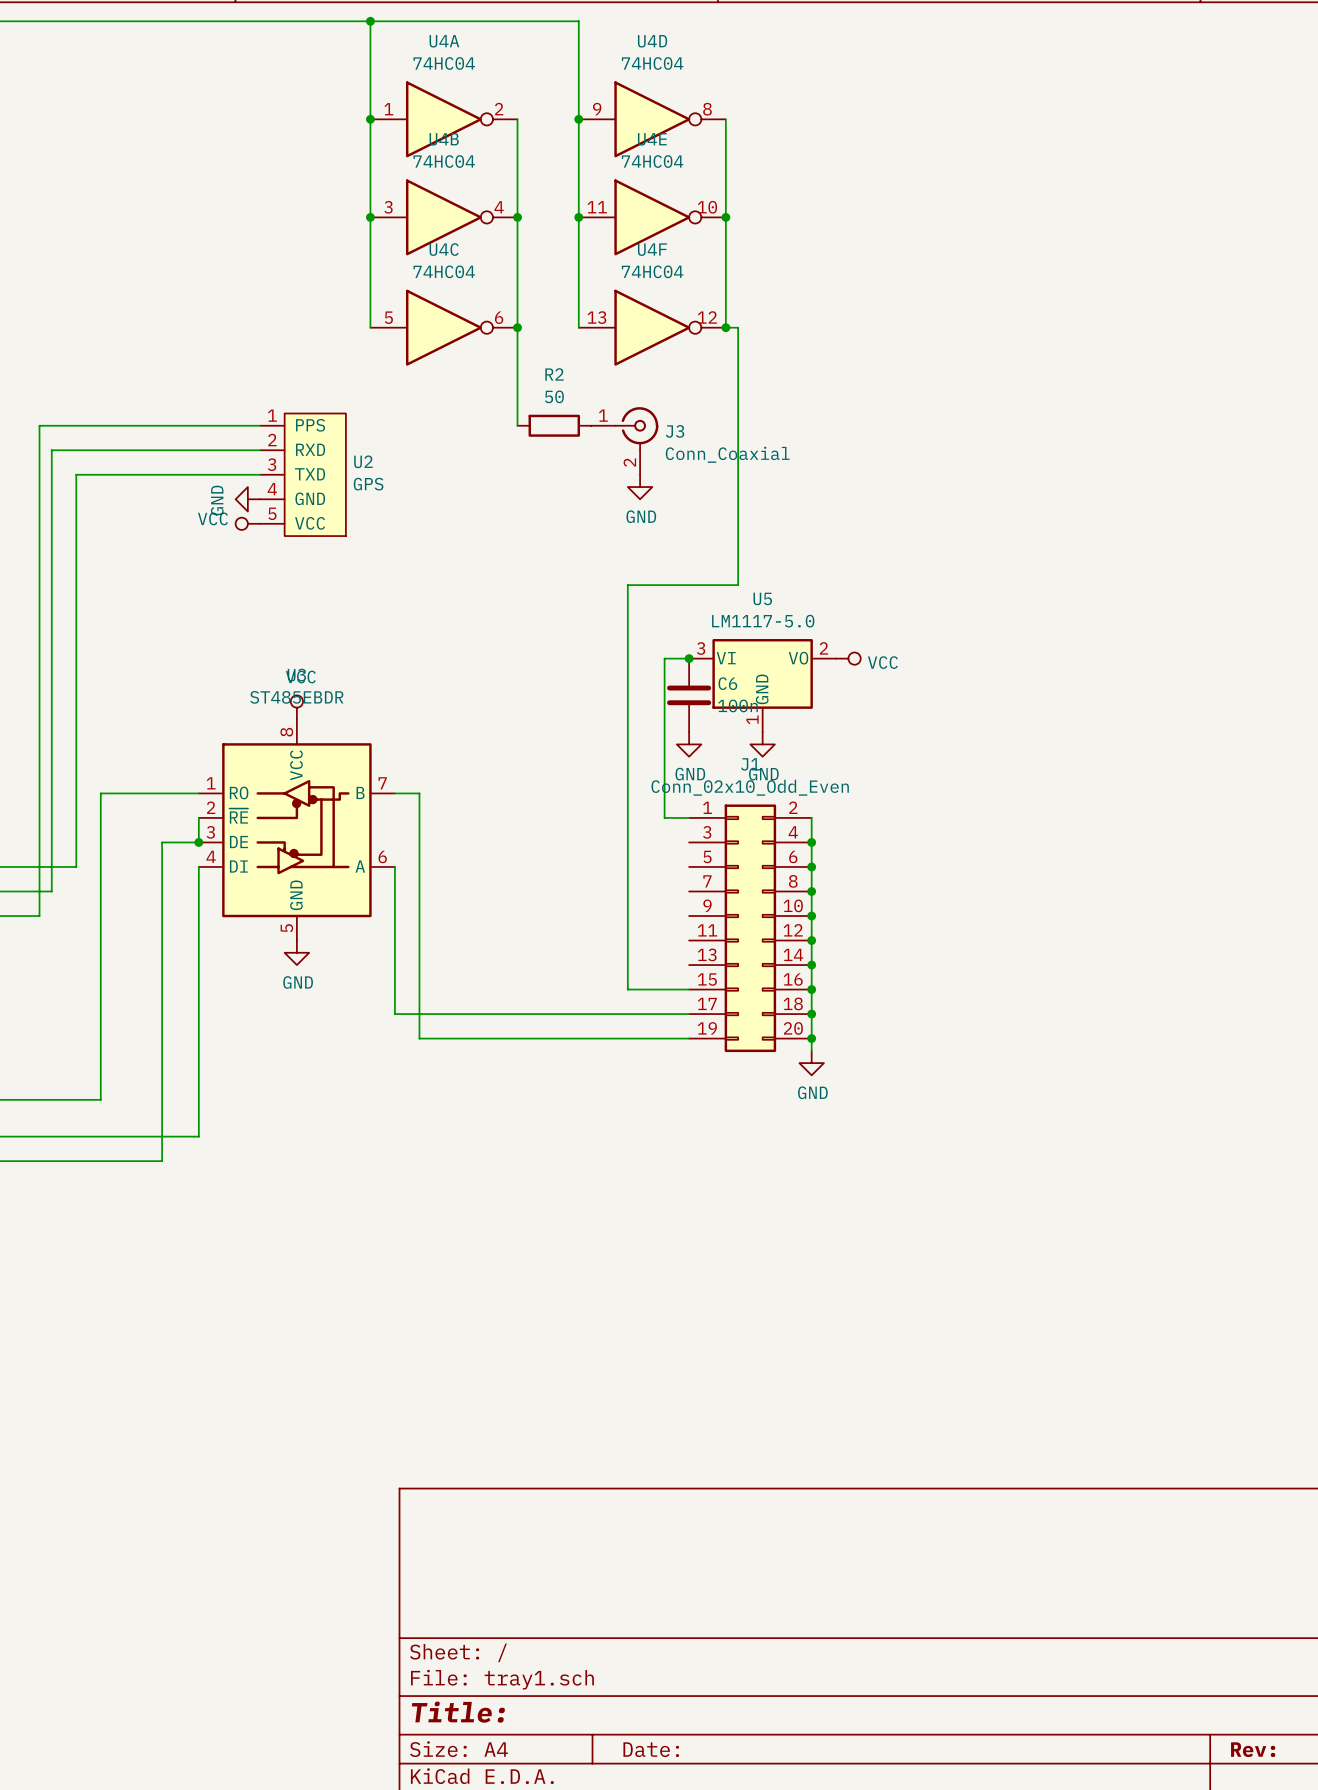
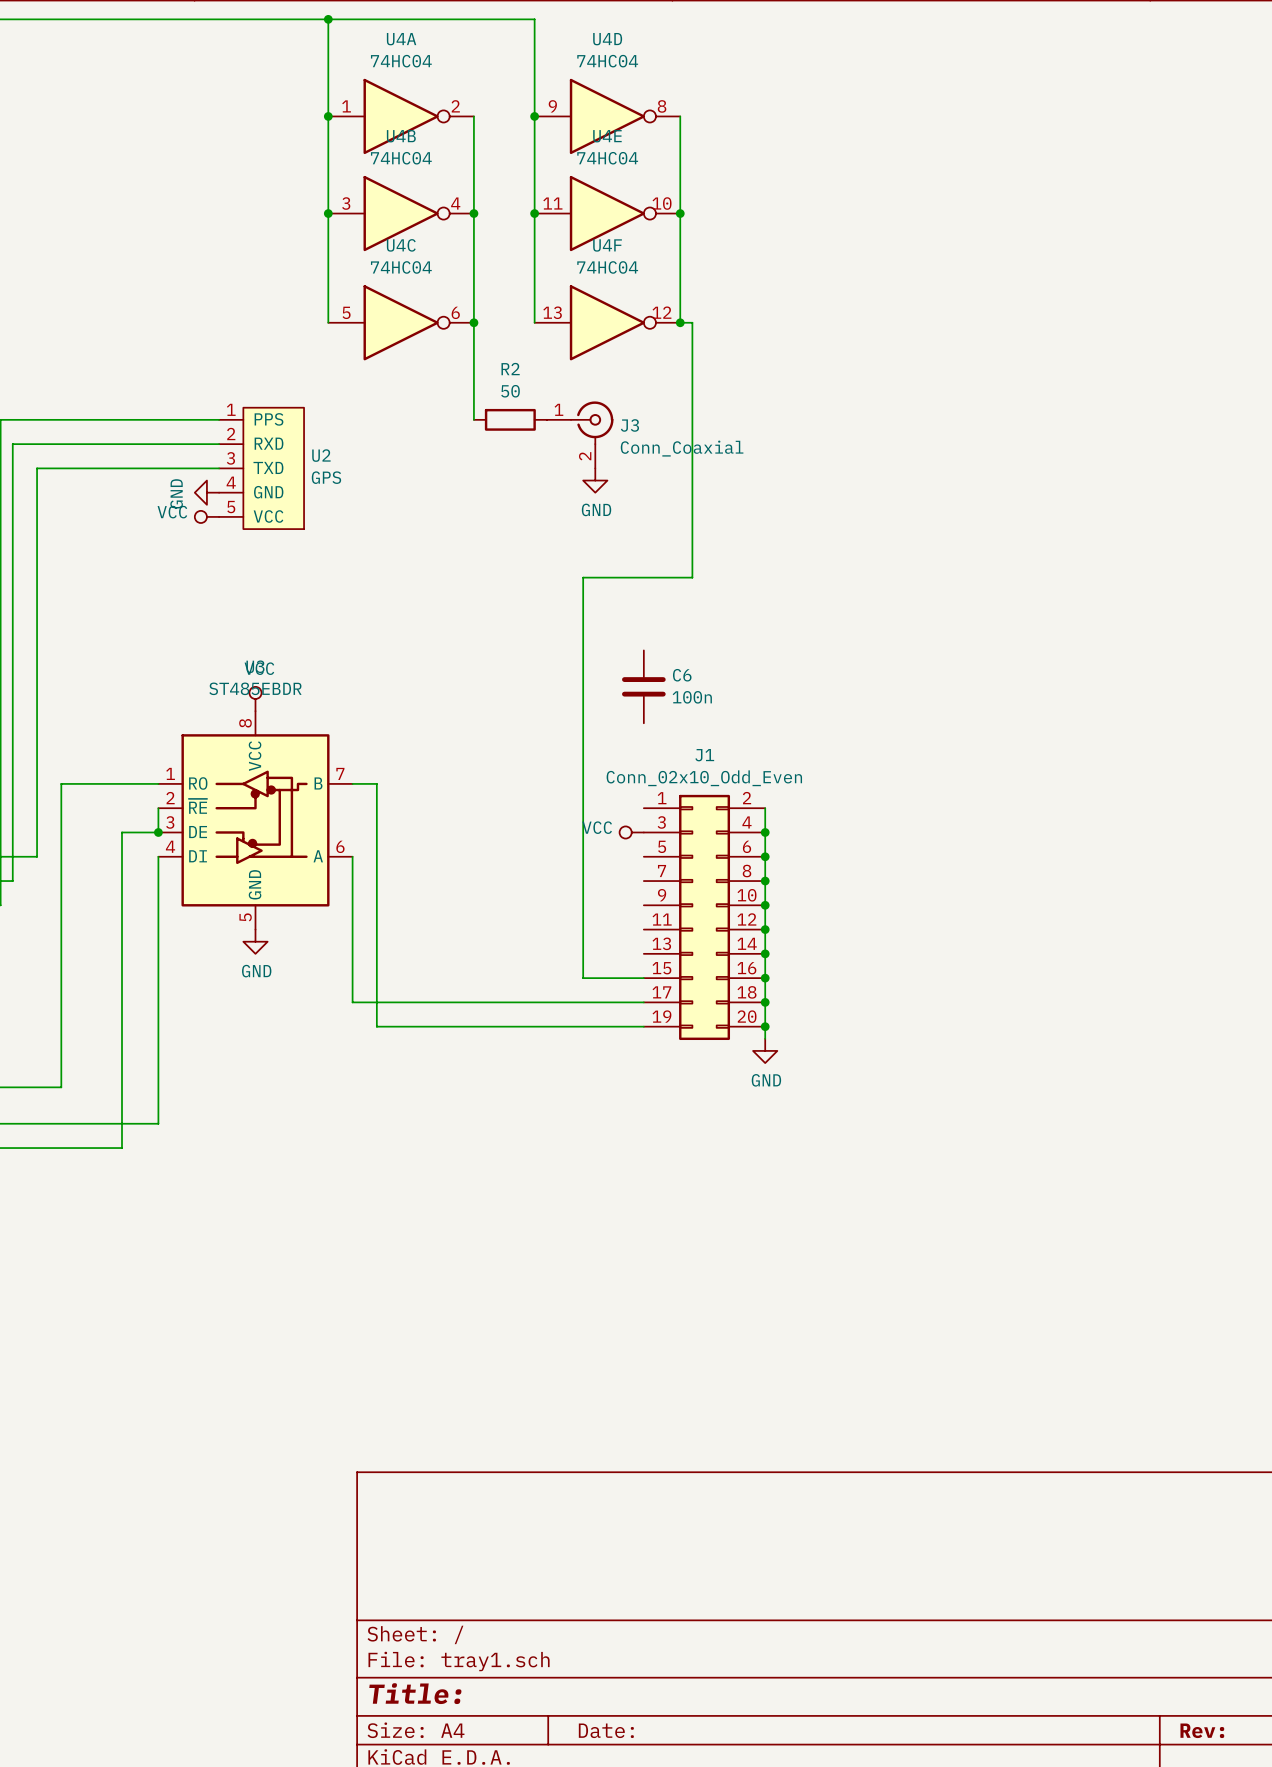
wire: (689, 658) (664, 658) (664, 817) (689, 817) -> none
junction: (689, 658) -> none
power symbol: VCC (848, 658) -> none
U5: LM1117-5.0 (762, 685) -> none
power symbol: GND (689, 744) -> none
power symbol: GND (762, 744) -> none
power symbol: none -> VCC (631, 832)

